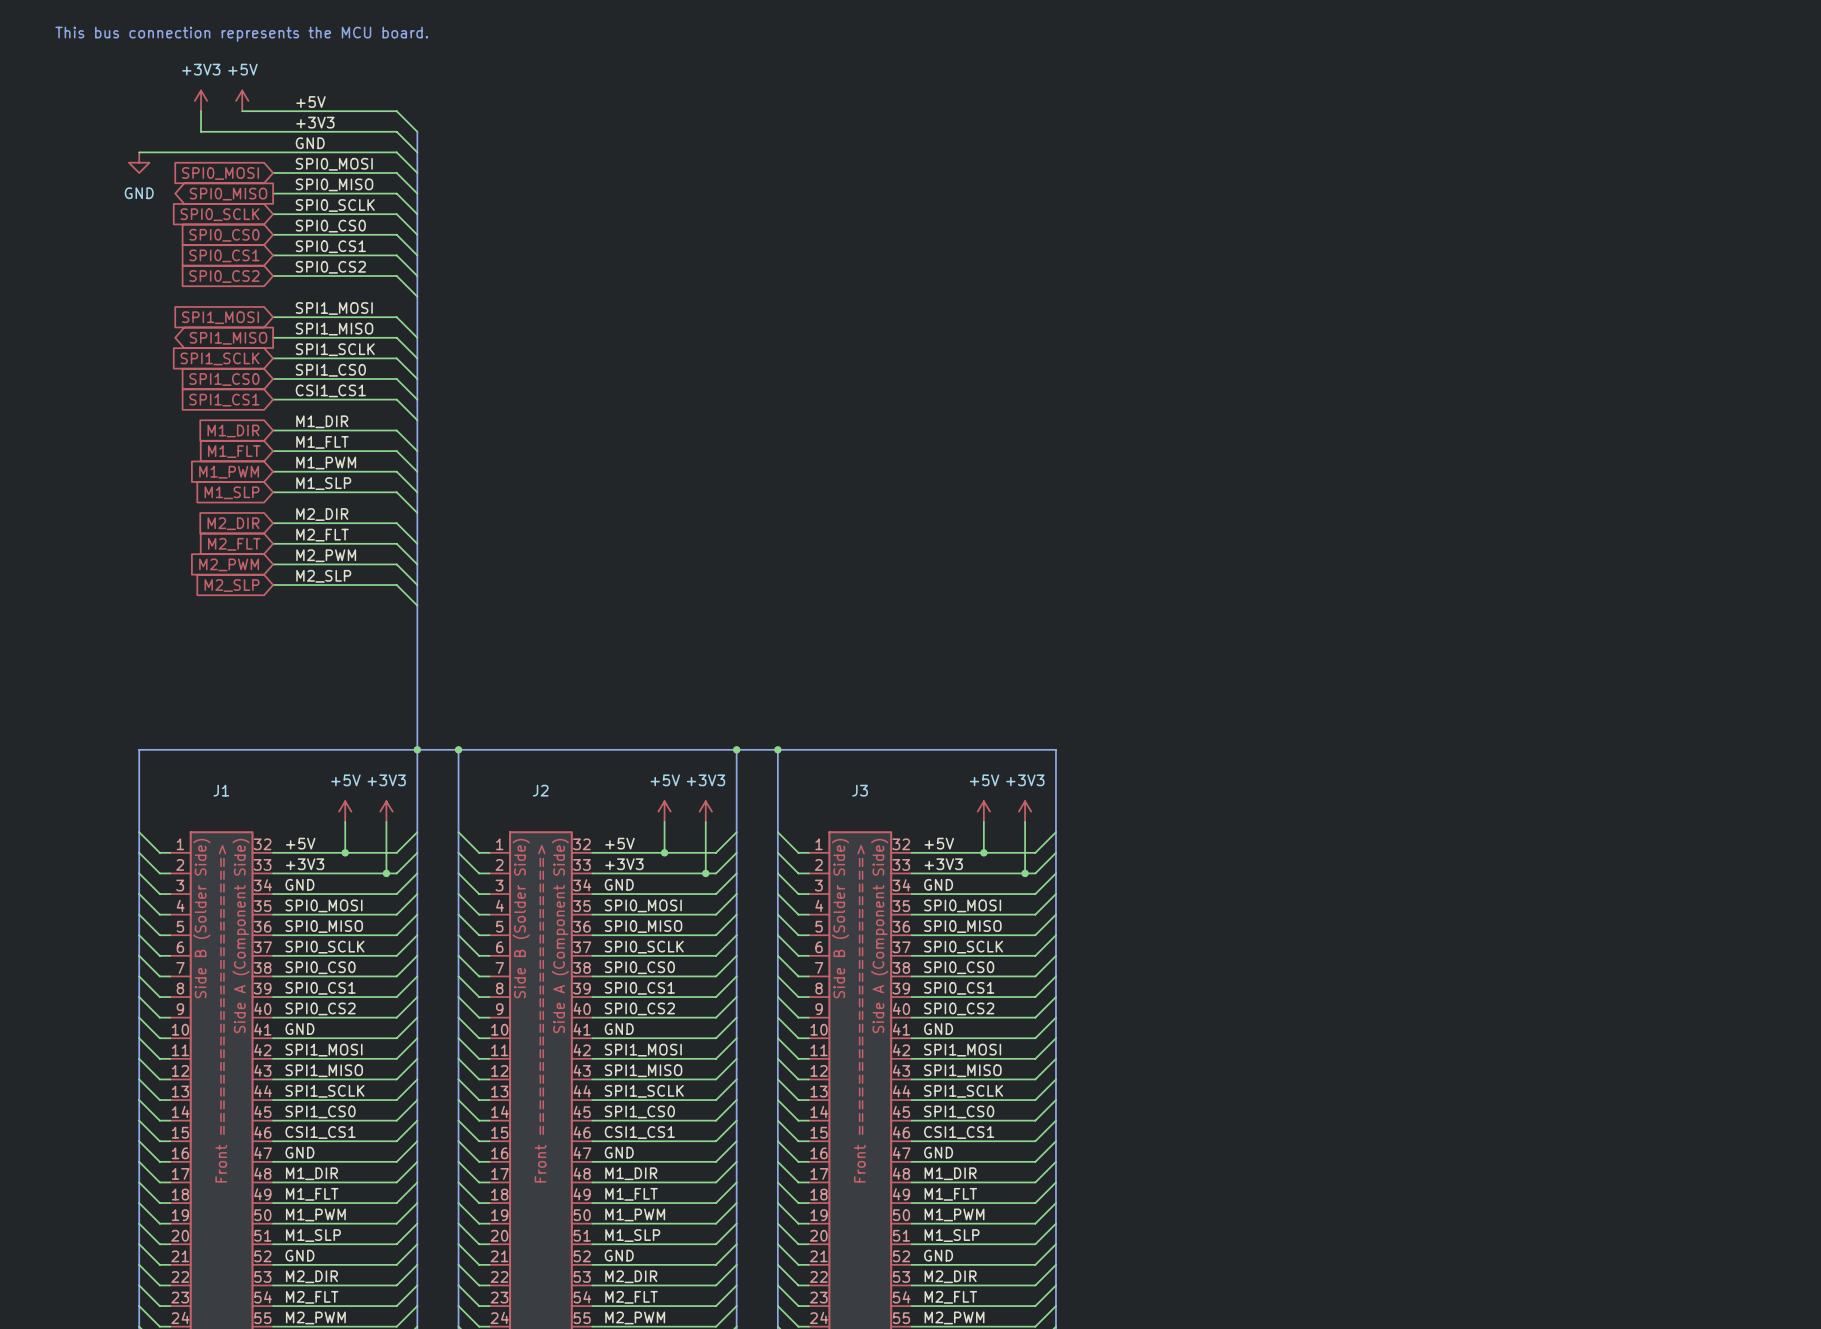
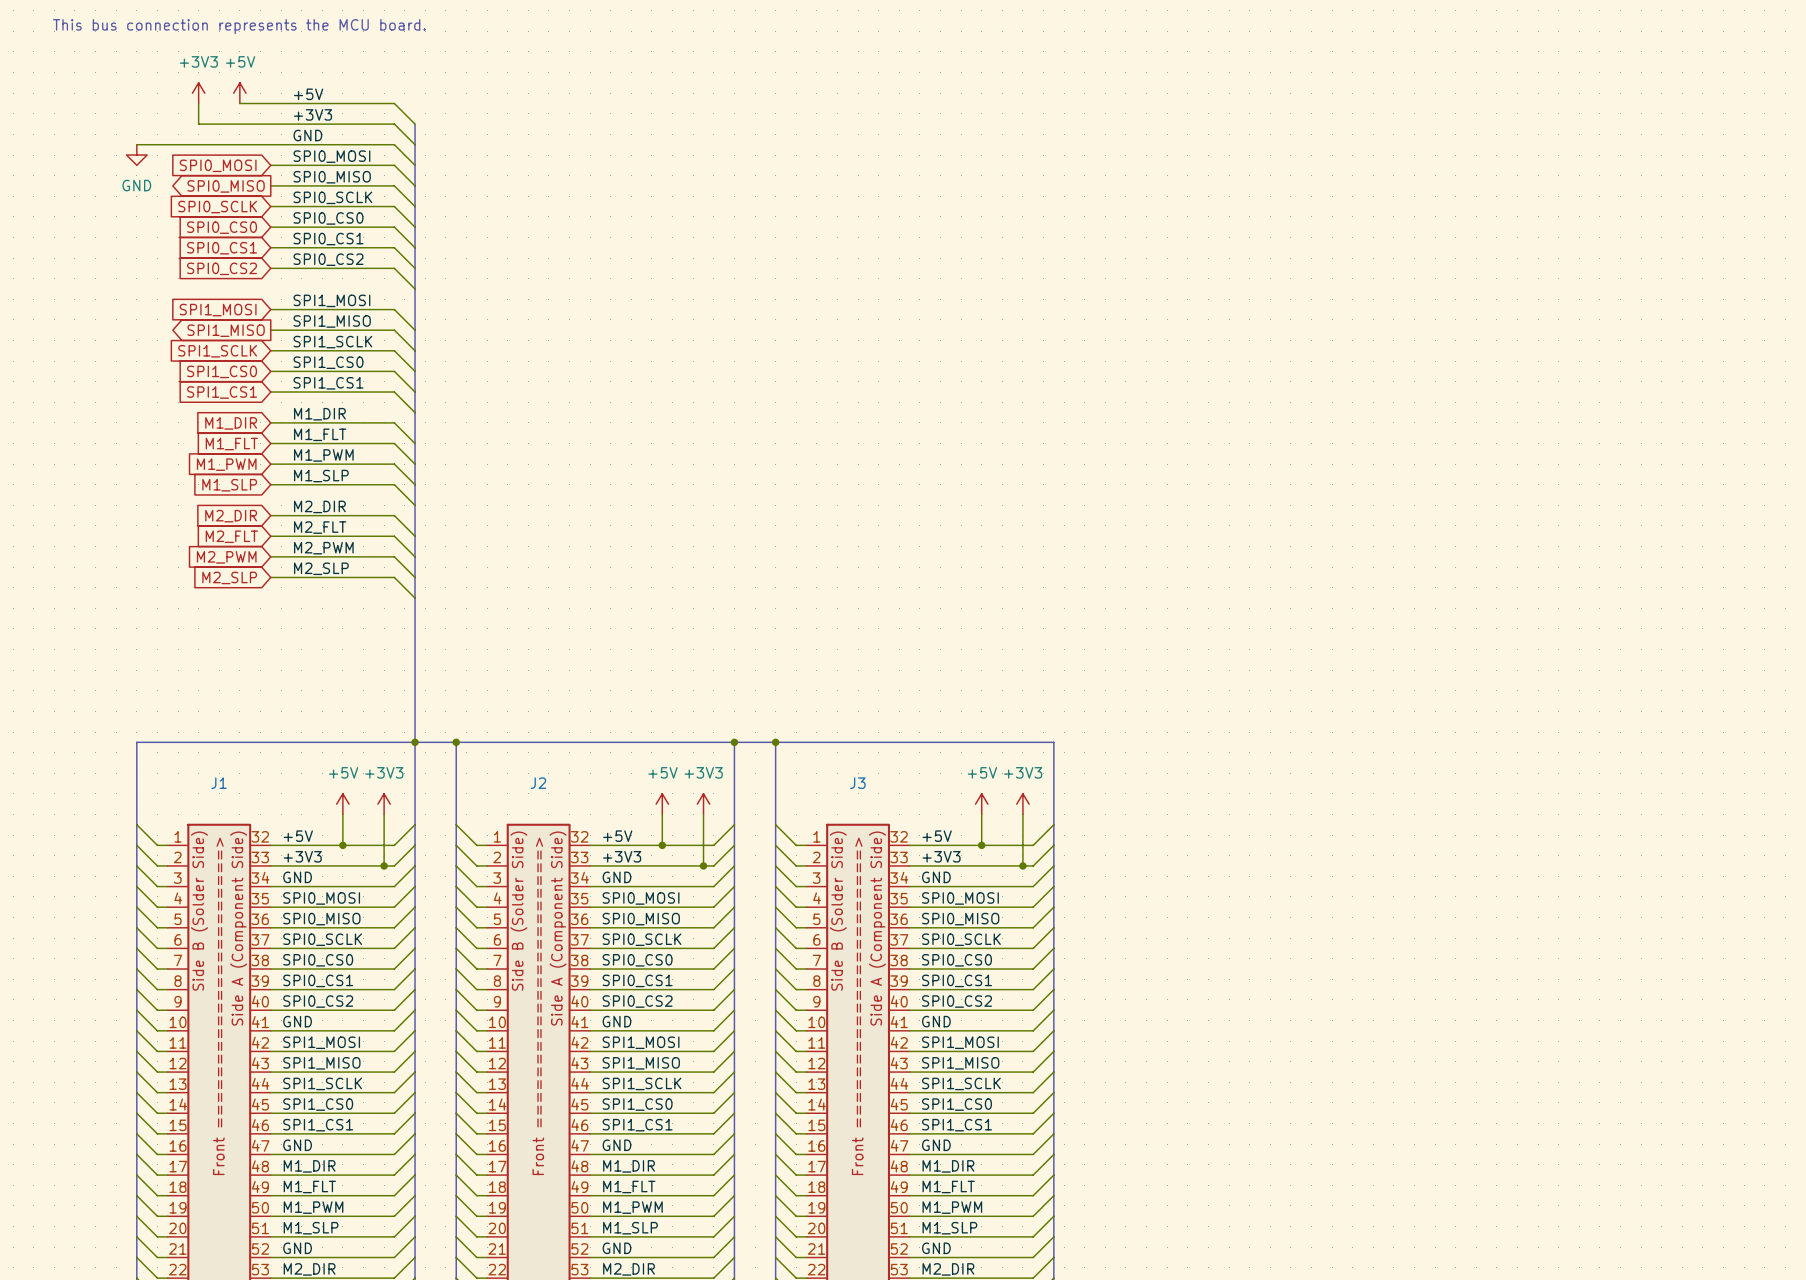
label: CSI1_CS1 (330, 390) -> SPI1_CS1 (328, 383)
label: CSI1_CS1 (320, 1132) -> SPI1_CS1 (318, 1125)
label: CSI1_CS1 (639, 1132) -> SPI1_CS1 (637, 1125)
label: CSI1_CS1 (959, 1132) -> SPI1_CS1 (957, 1125)

